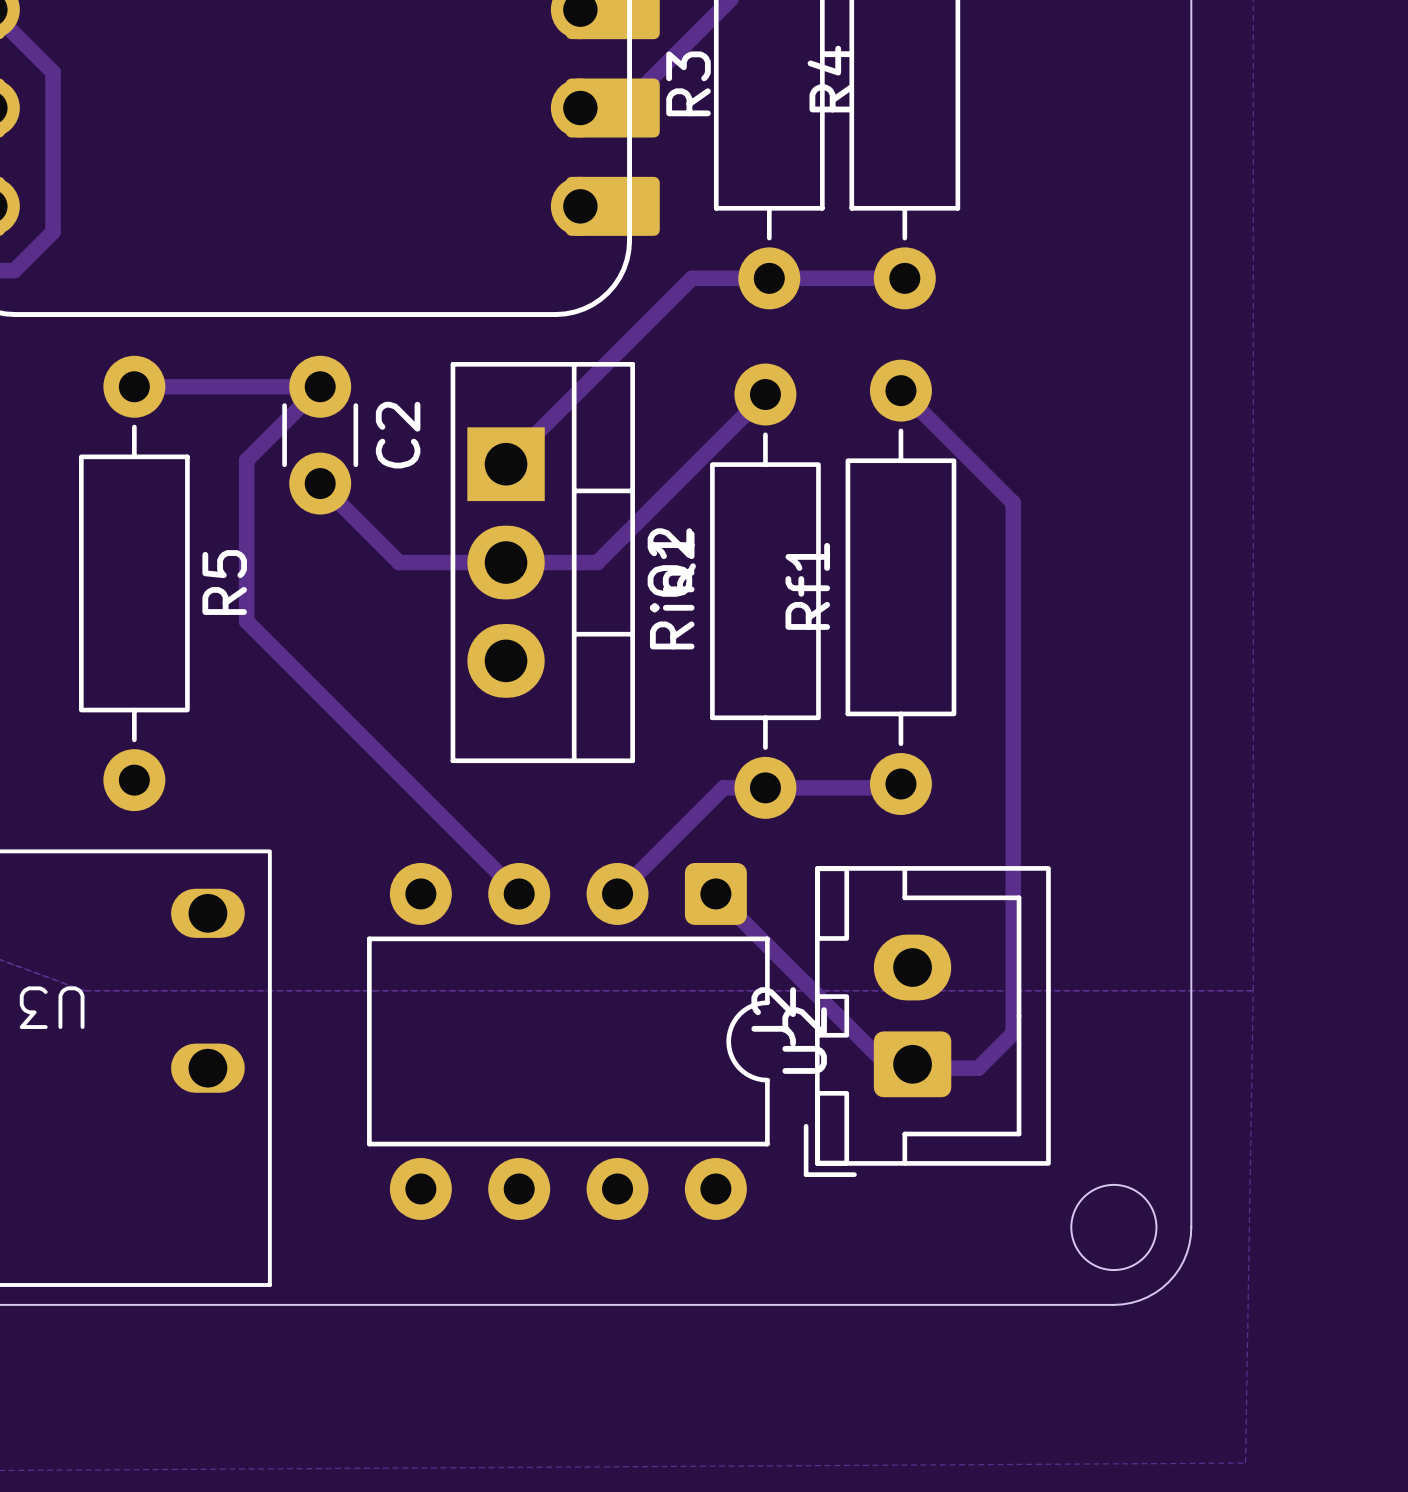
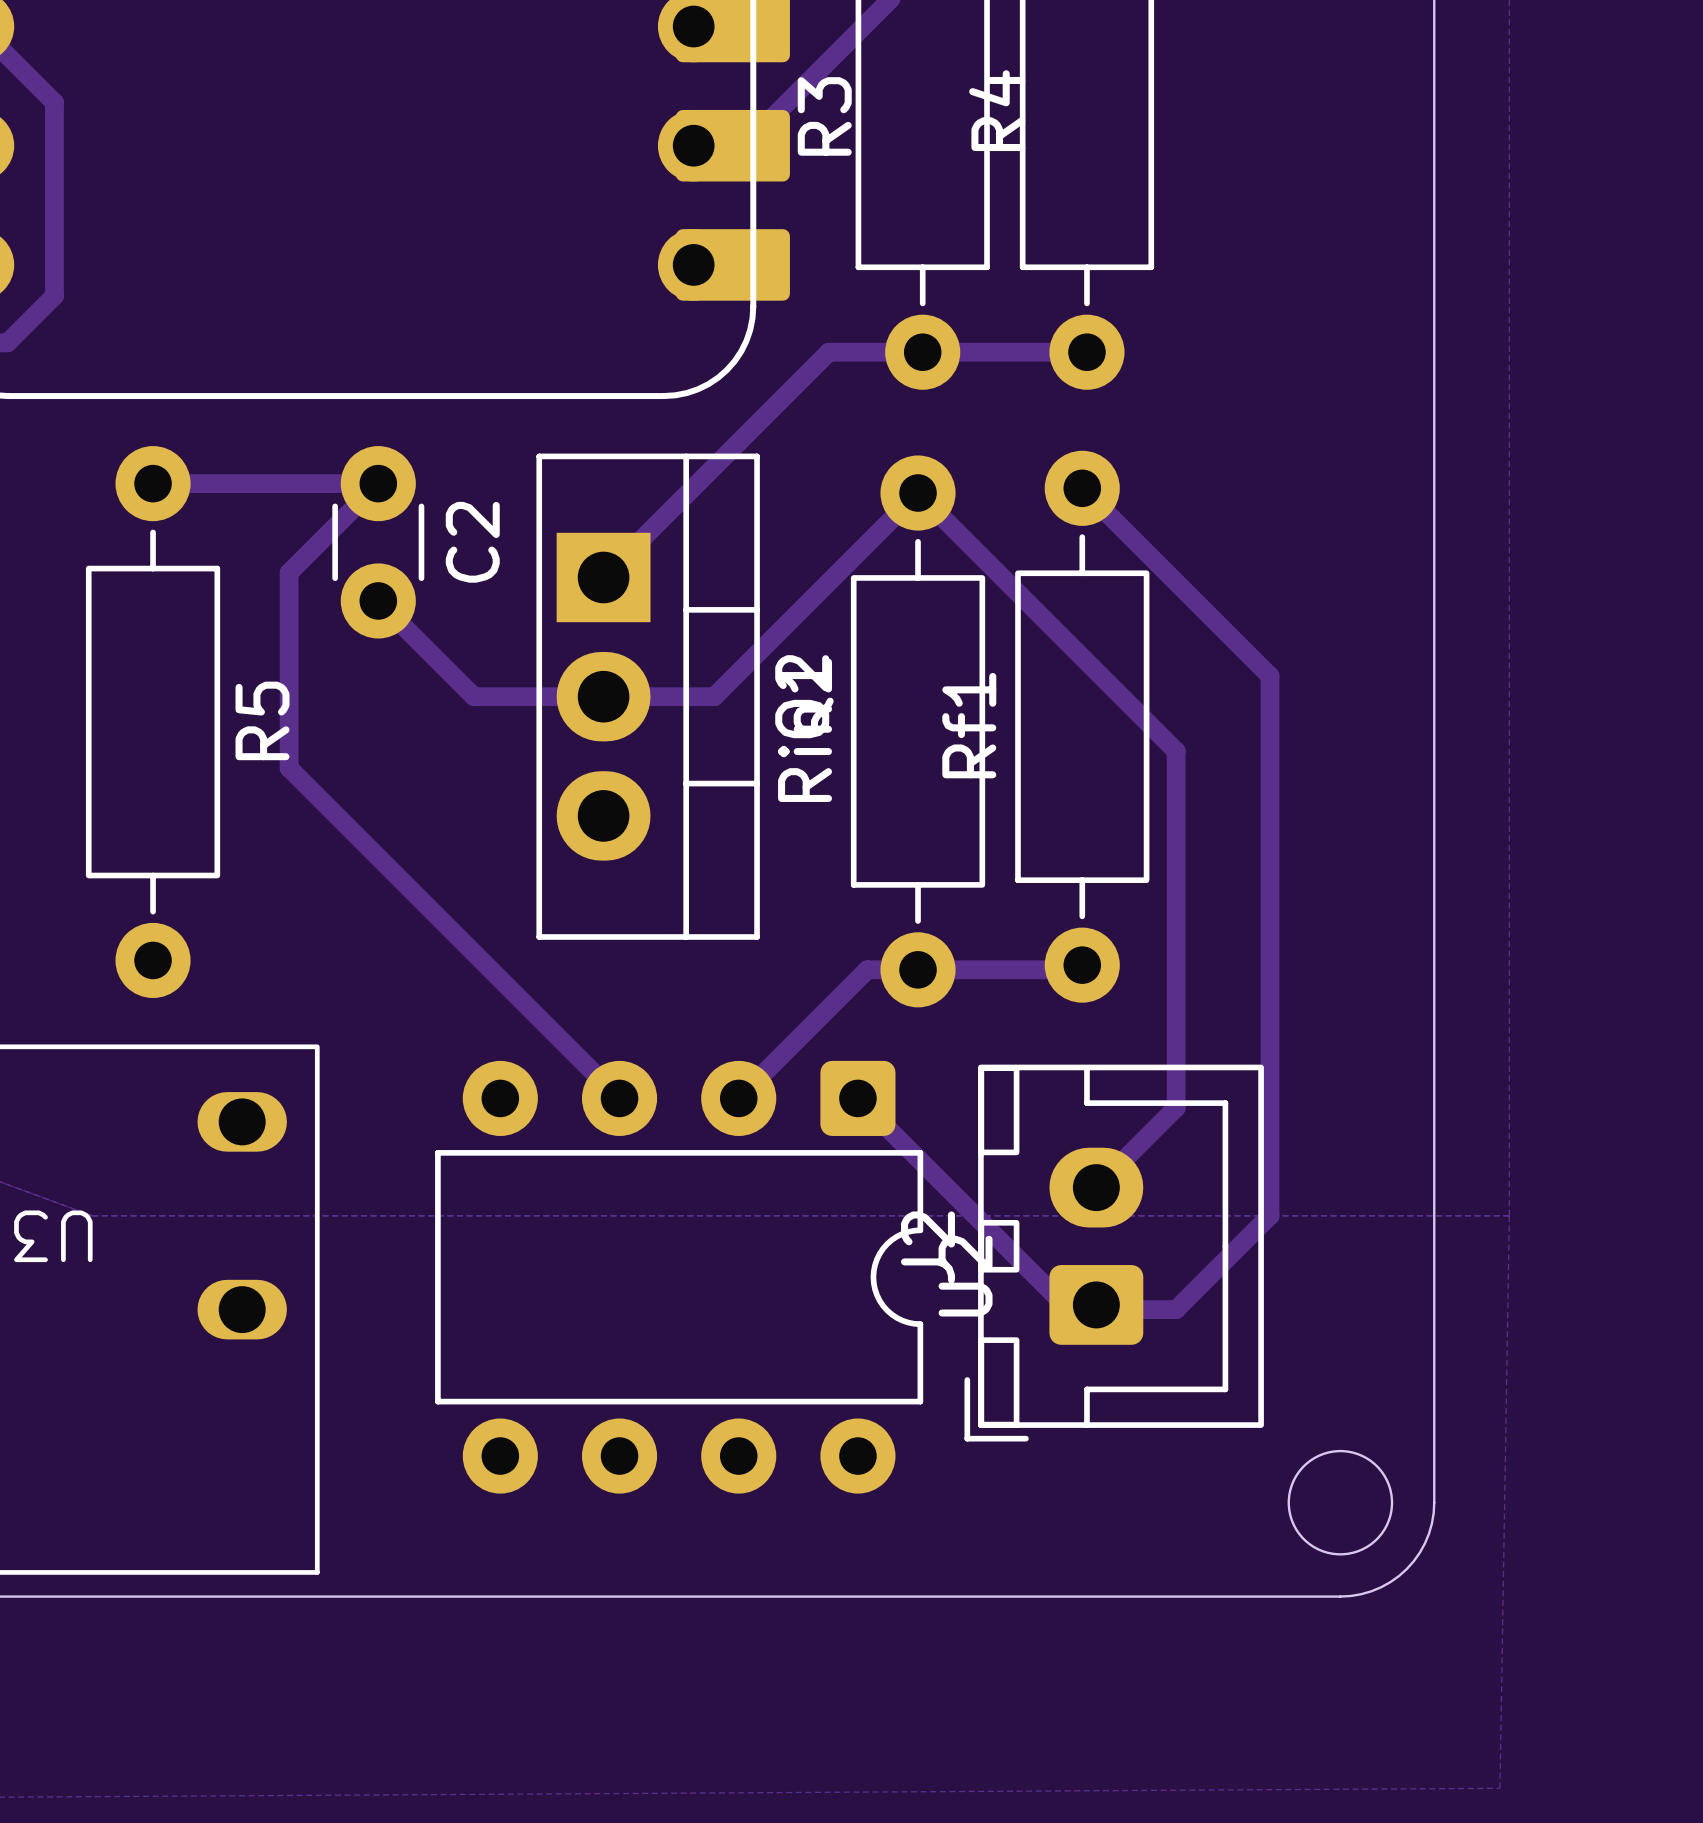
track: none -> (918, 493) (1176, 751) (1176, 1107) (1096, 1187)
track: (1013, 502) (1013, 1033) -> (1218, 624) (1270, 676) (1270, 1215) (1218, 1267)

